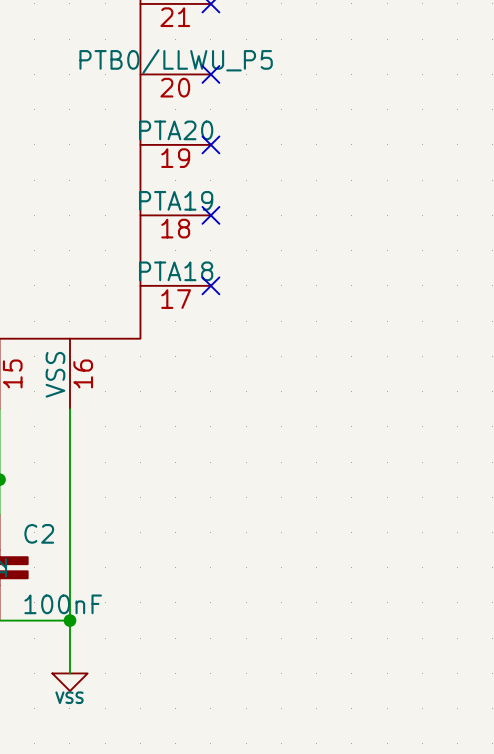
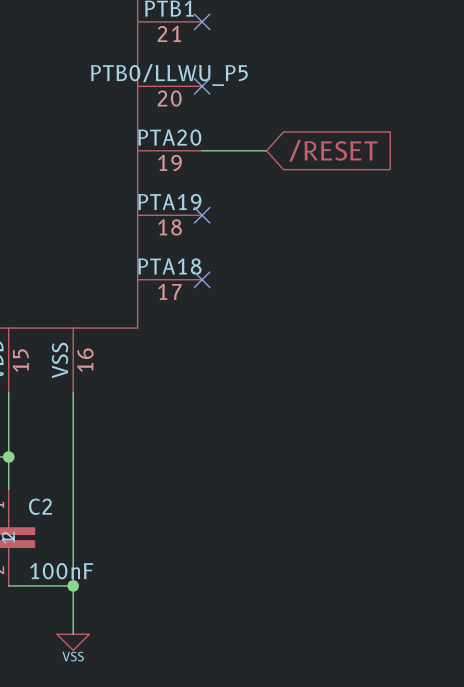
wire: none -> (202, 150) (266, 150)
no-connect mark: (210, 144) -> none
global label: none -> /RESET (333, 150)

